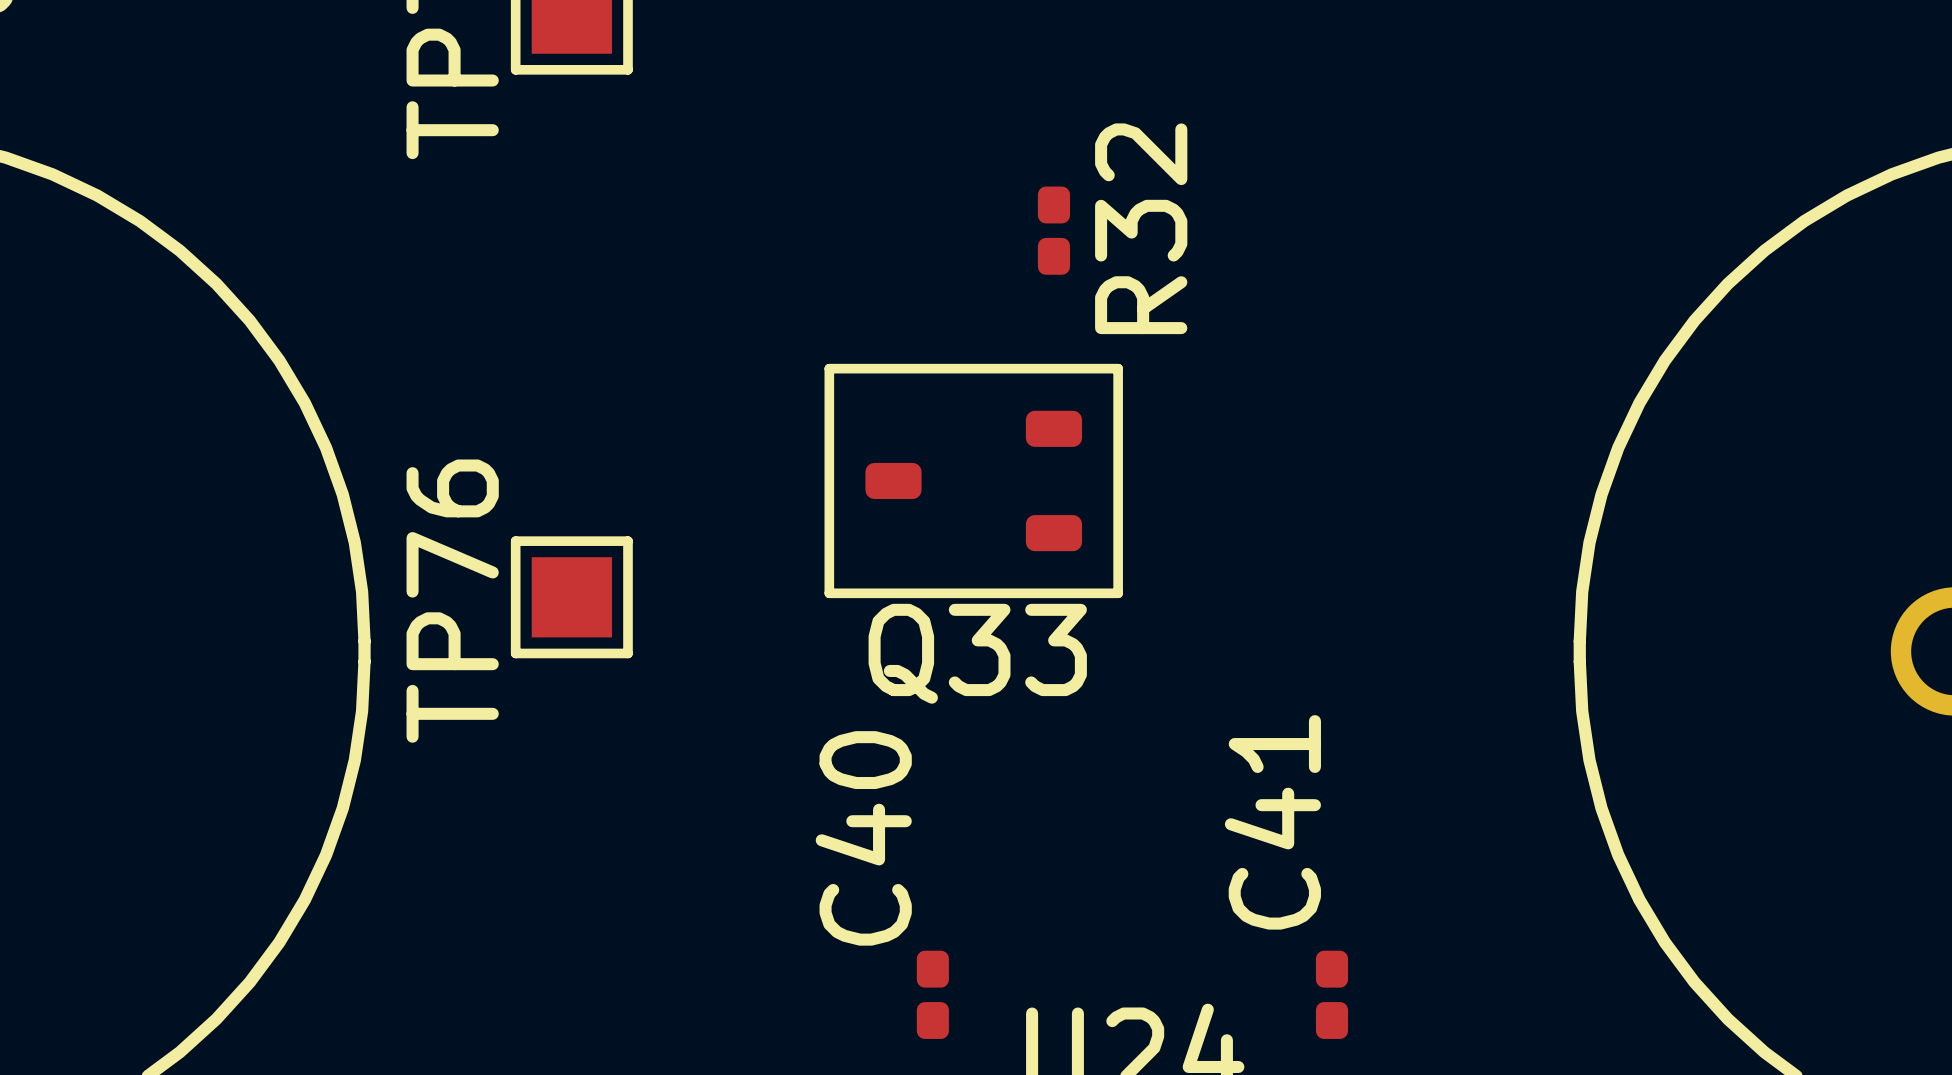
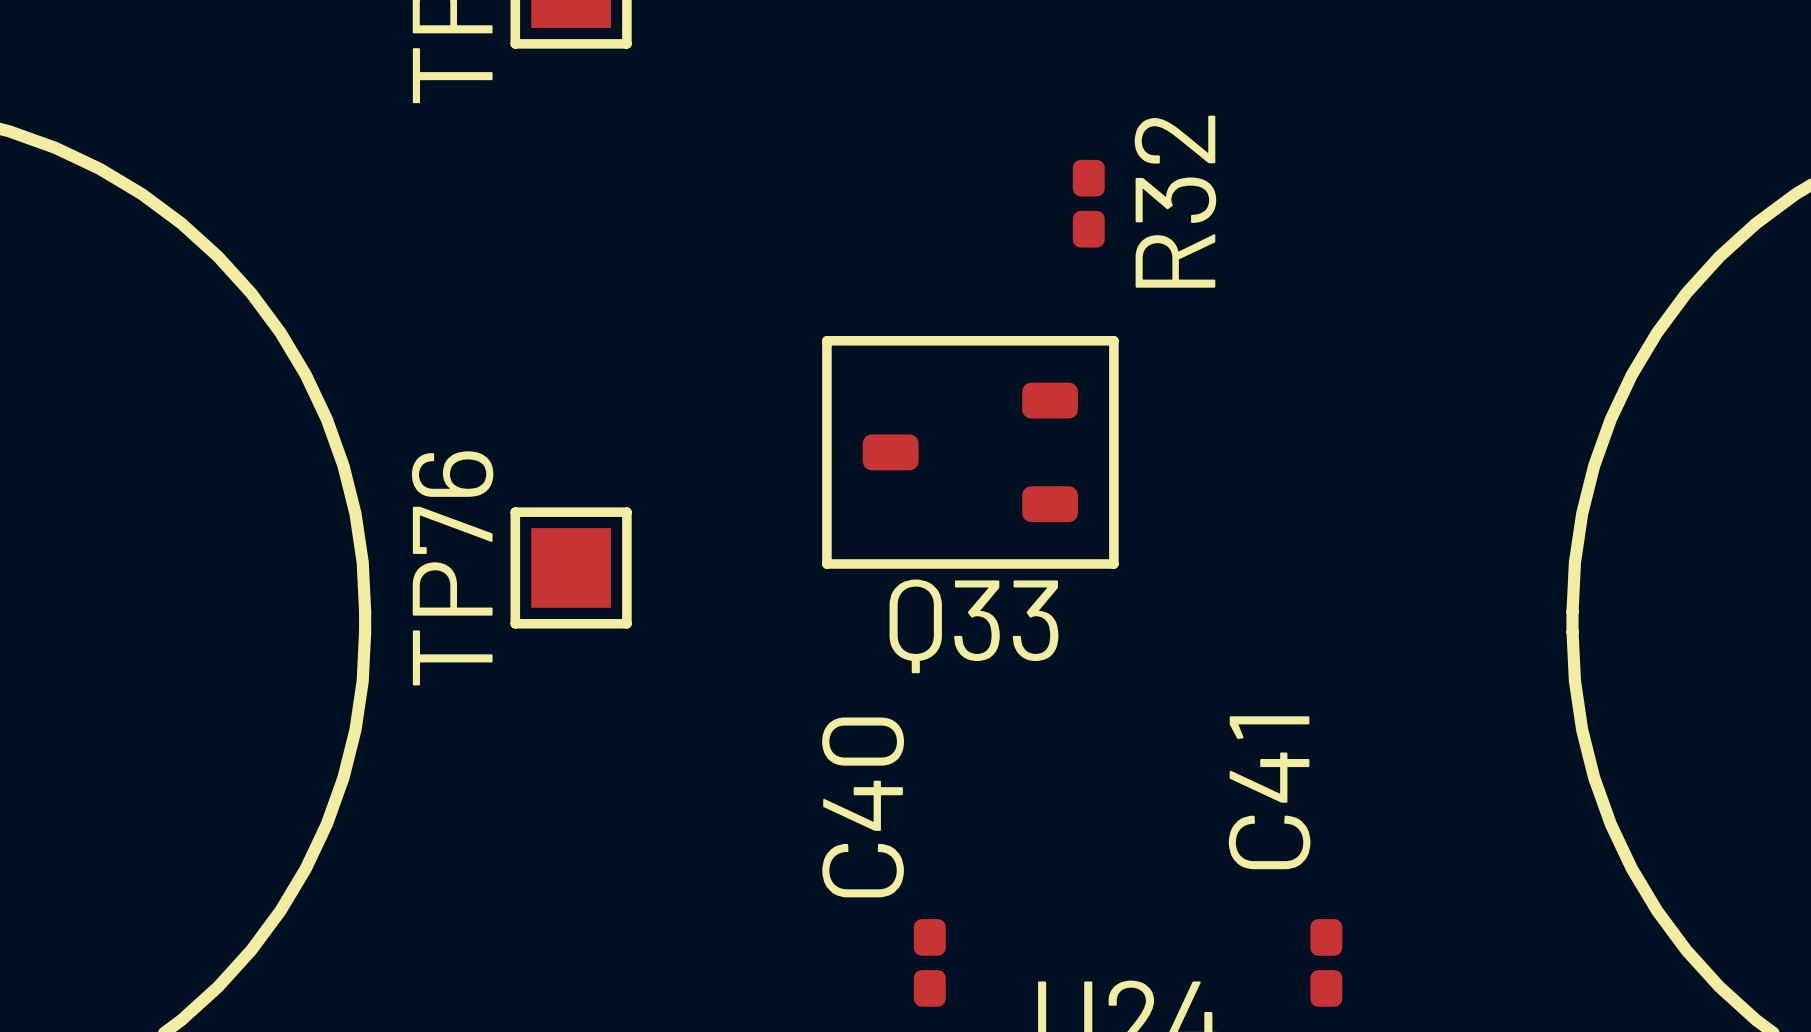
R32 position: (1053, 230) -> (1088, 203)

